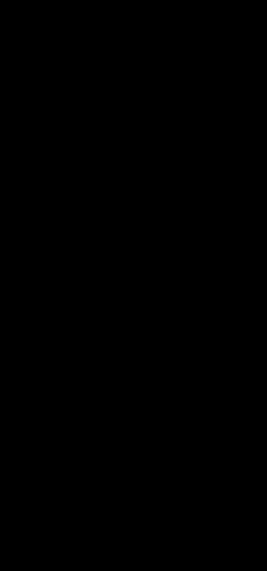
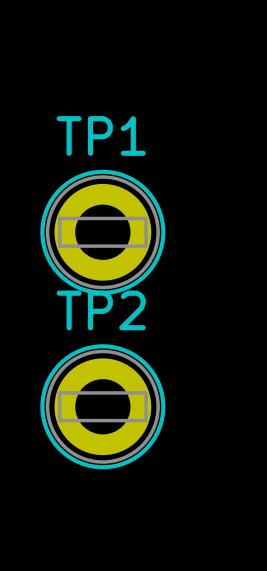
TP1: none -> (102, 232)
TP2: none -> (102, 406)

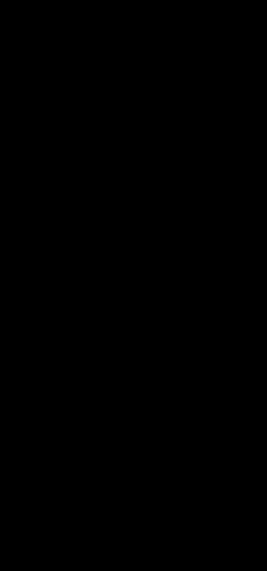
TP1: (102, 232) -> none
TP2: (102, 406) -> none

